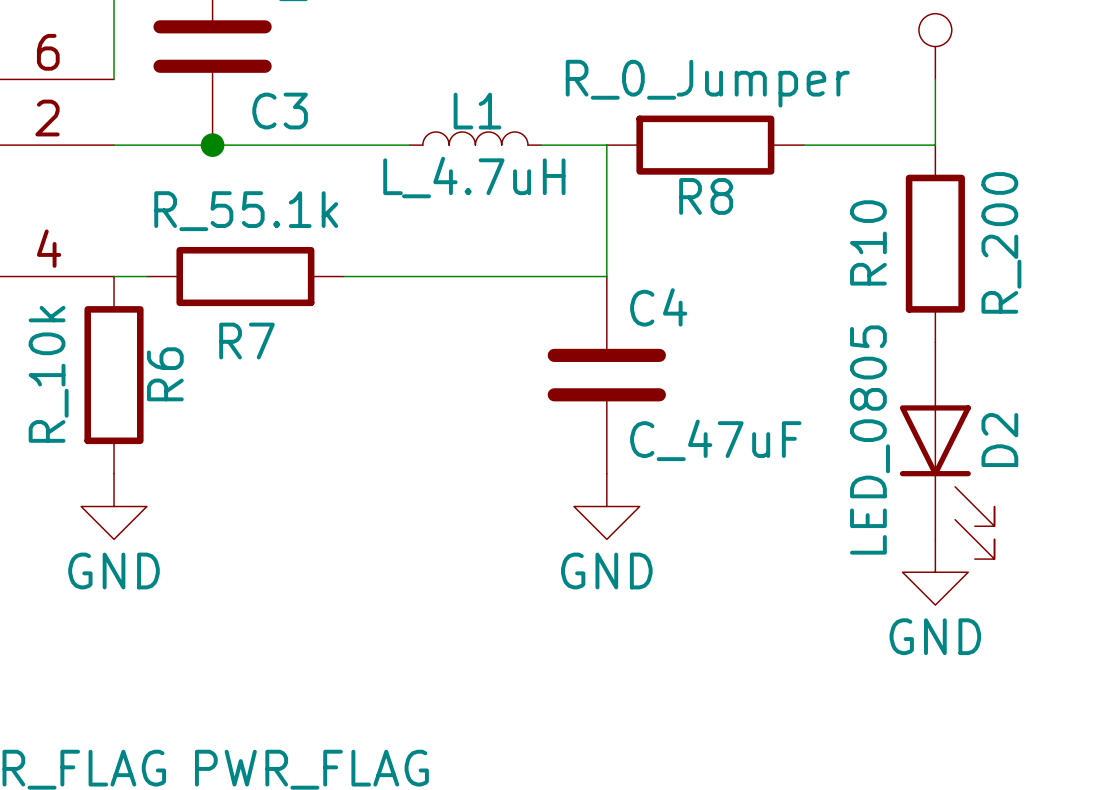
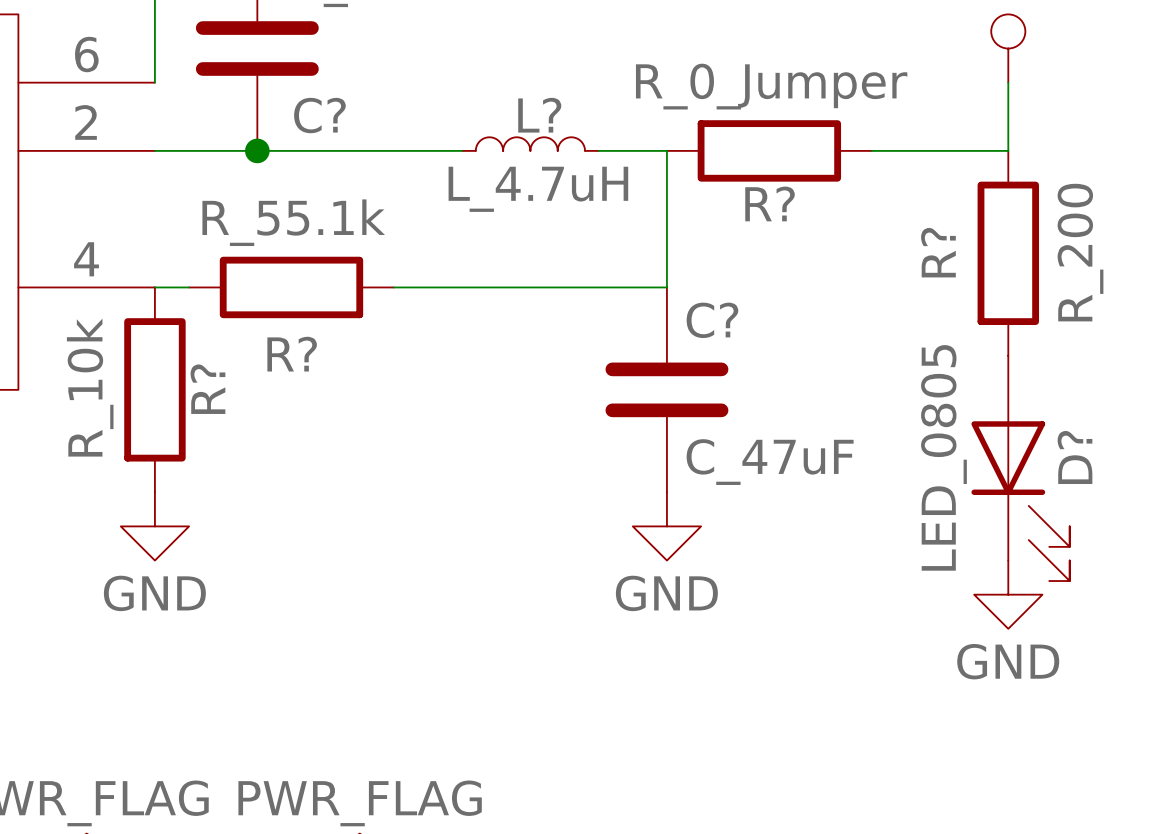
C3 name: C3 (280, 111) -> C? (319, 115)
L1 name: L1 (477, 111) -> L? (539, 115)
R8 name: R8 (706, 196) -> R? (770, 203)
R10 name: R10 (868, 242) -> R? (938, 252)
C4 name: C4 (658, 307) -> C? (712, 320)
R7 name: R7 (246, 341) -> R? (292, 354)
R6 name: R6 (165, 374) -> R? (207, 389)
D2 name: D2 (999, 440) -> D? (1074, 457)

